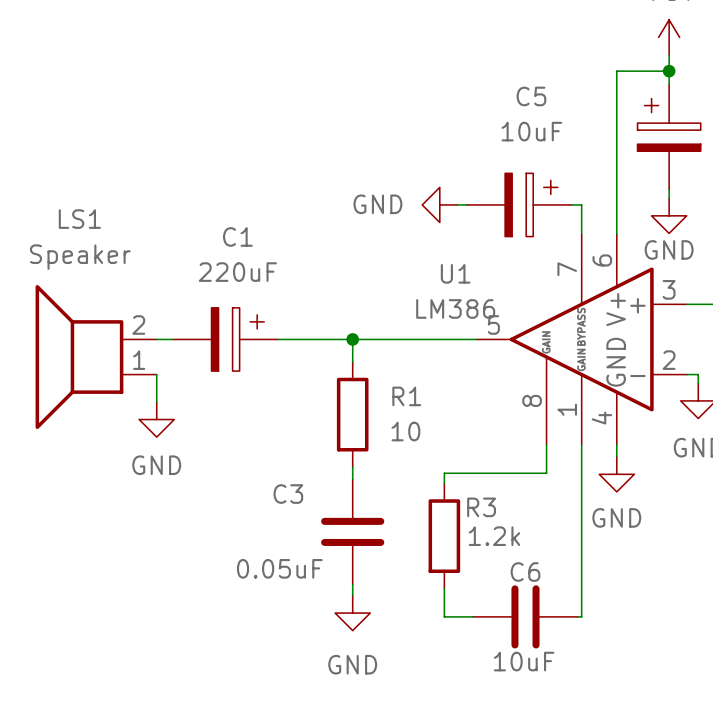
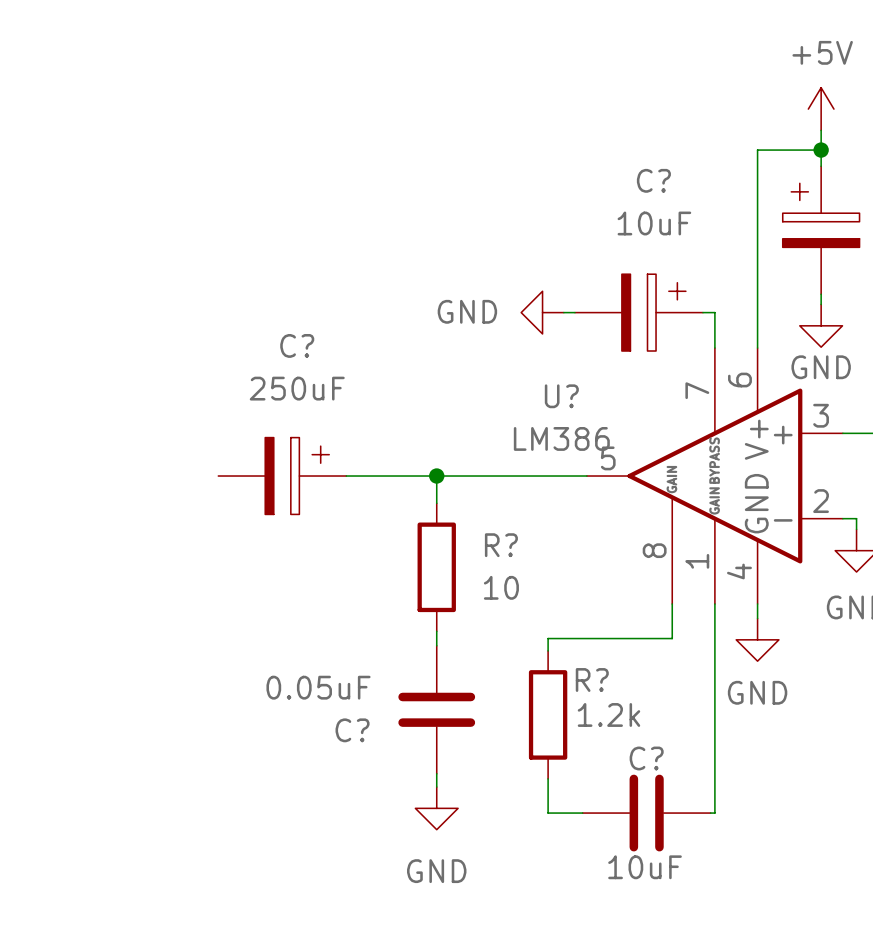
C5 name: C5 (531, 96) -> C? (653, 180)
C1 name: C1 (237, 236) -> C? (297, 345)
C1 value: 220uF (237, 272) -> 250uF (297, 388)
U1 name: U1 (455, 273) -> U? (561, 396)
wire: (156, 339) (172, 339) -> none
LS1: Speaker (96, 357) -> none
wire: (156, 374) (156, 401) -> none
R1 name: R1 (406, 396) -> R? (501, 545)
power symbol: GND (156, 419) -> none
C3 name: C3 (288, 494) -> C? (352, 730)
R3 name: R3 (481, 507) -> R? (592, 679)
C3 value position: 0.05uF (279, 568) -> 0.05uF (318, 687)
C6 name: C6 (525, 572) -> C? (646, 758)

